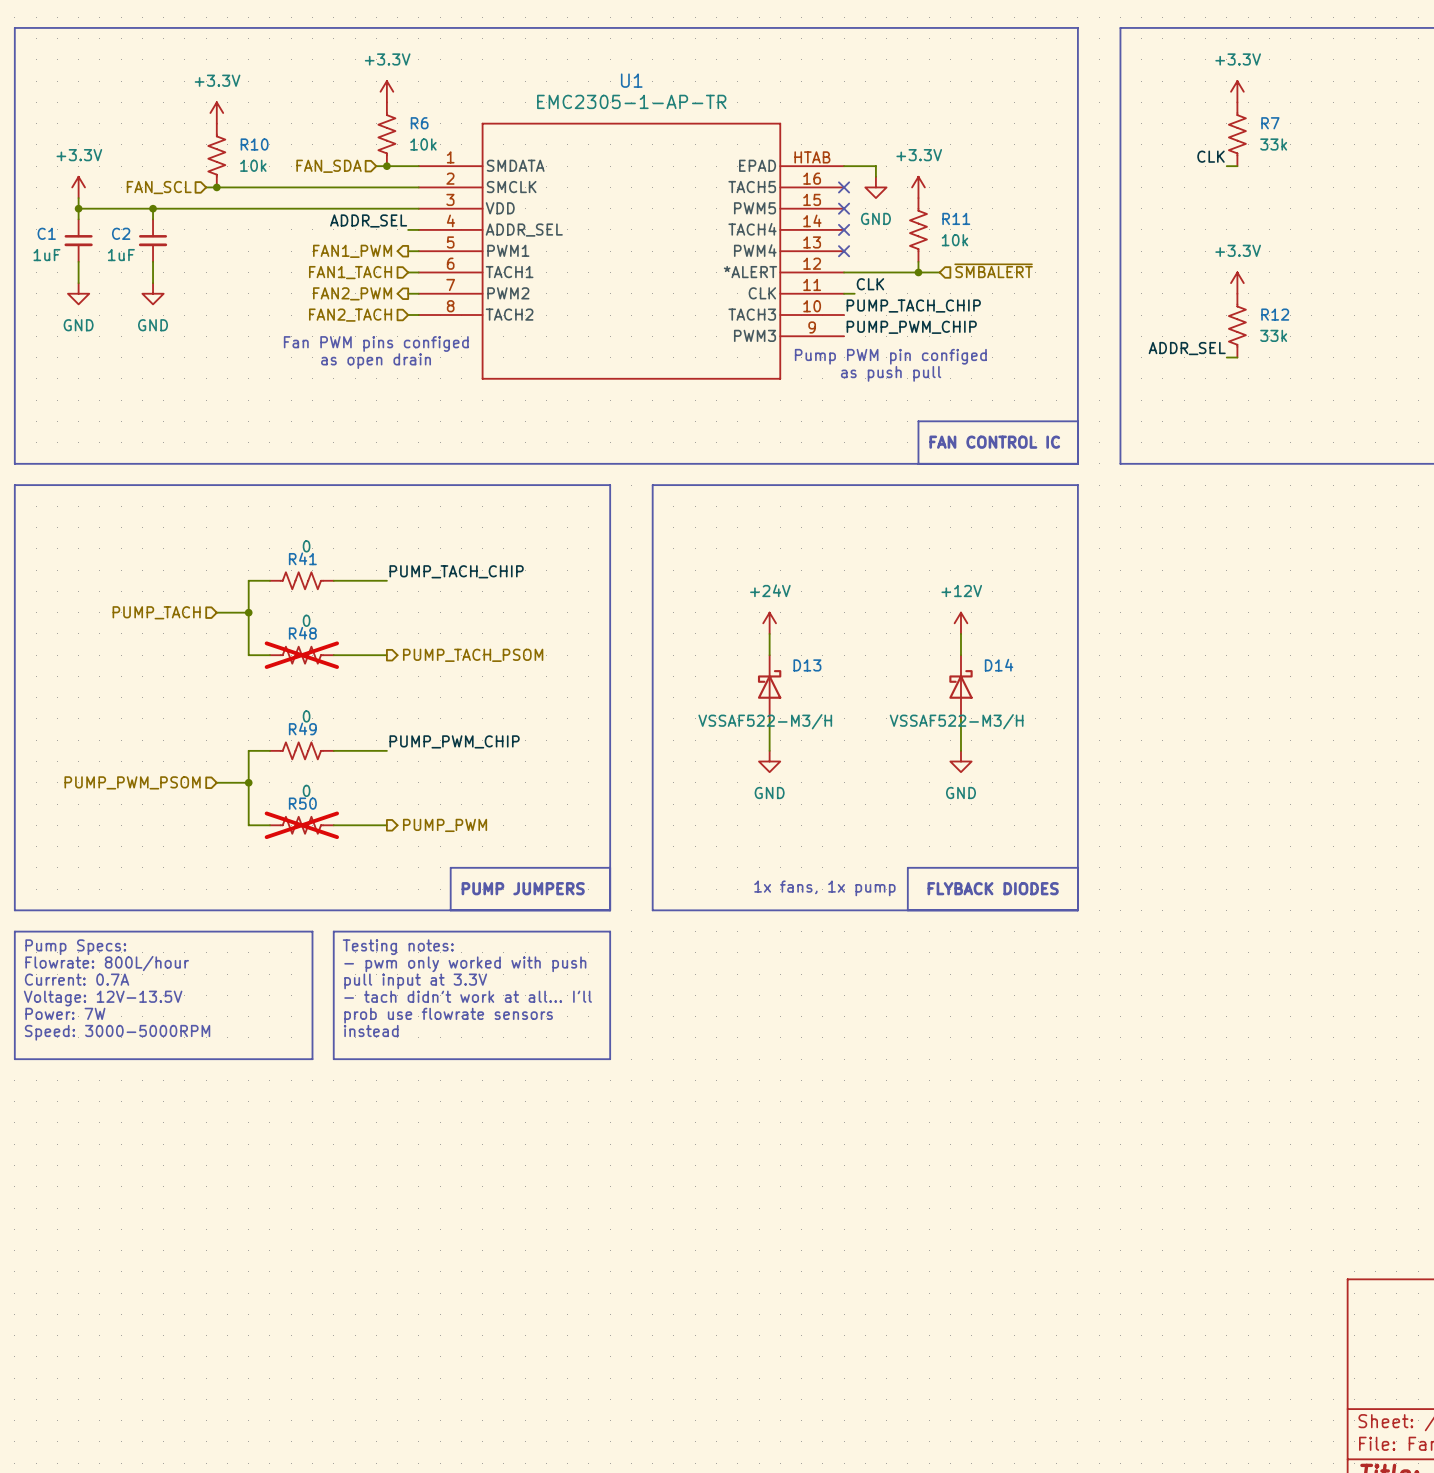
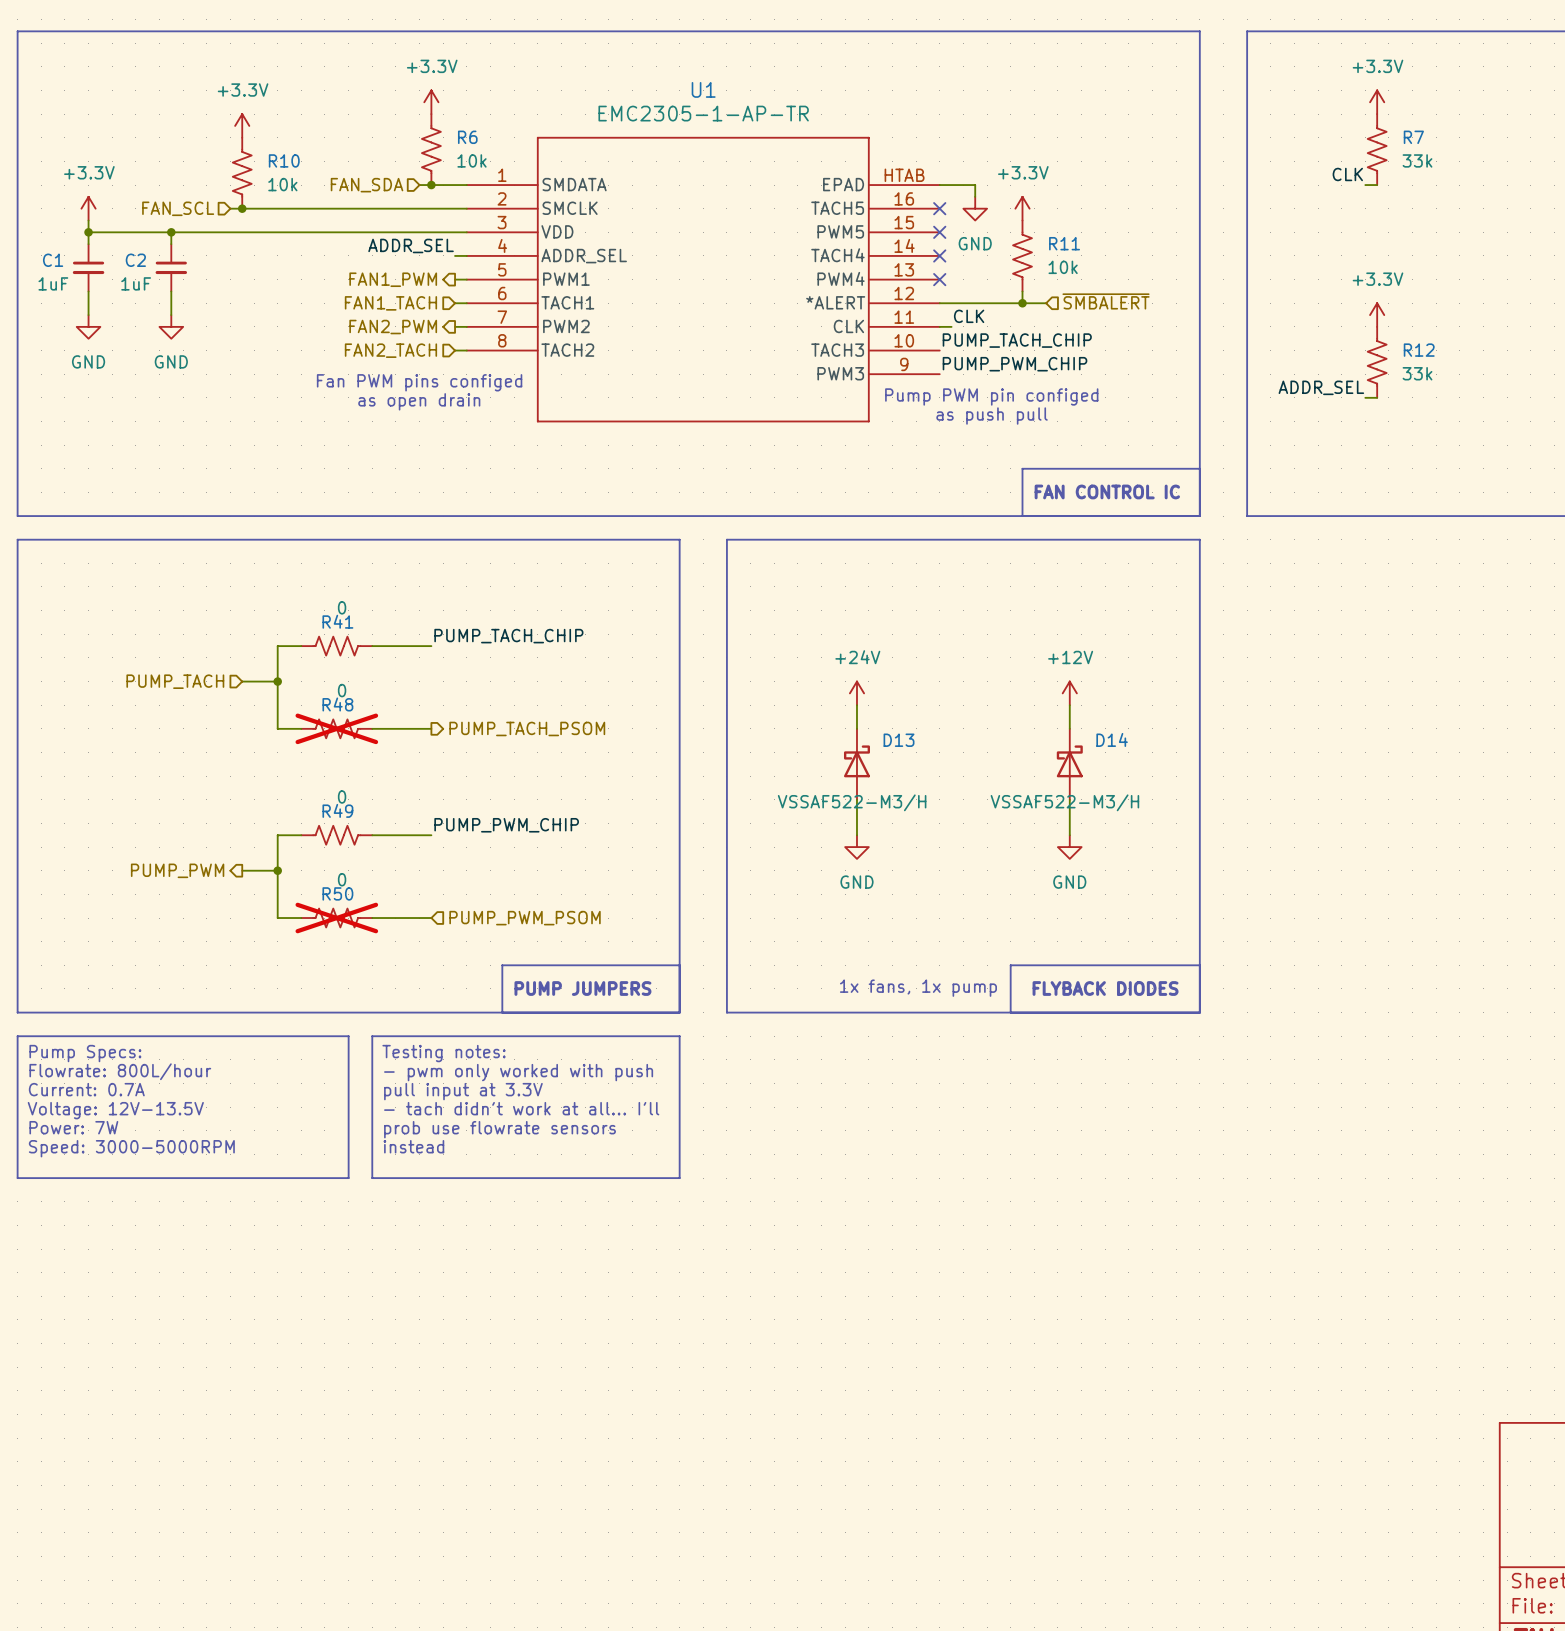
hierarchical label shape: input (132, 782) -> output (177, 870)
hierarchical label: PUMP_PWM_PSOM (132, 782) -> PUMP_PWM (177, 870)
hierarchical label shape: output (445, 825) -> input (525, 918)
hierarchical label: PUMP_PWM (445, 825) -> PUMP_PWM_PSOM (525, 918)

